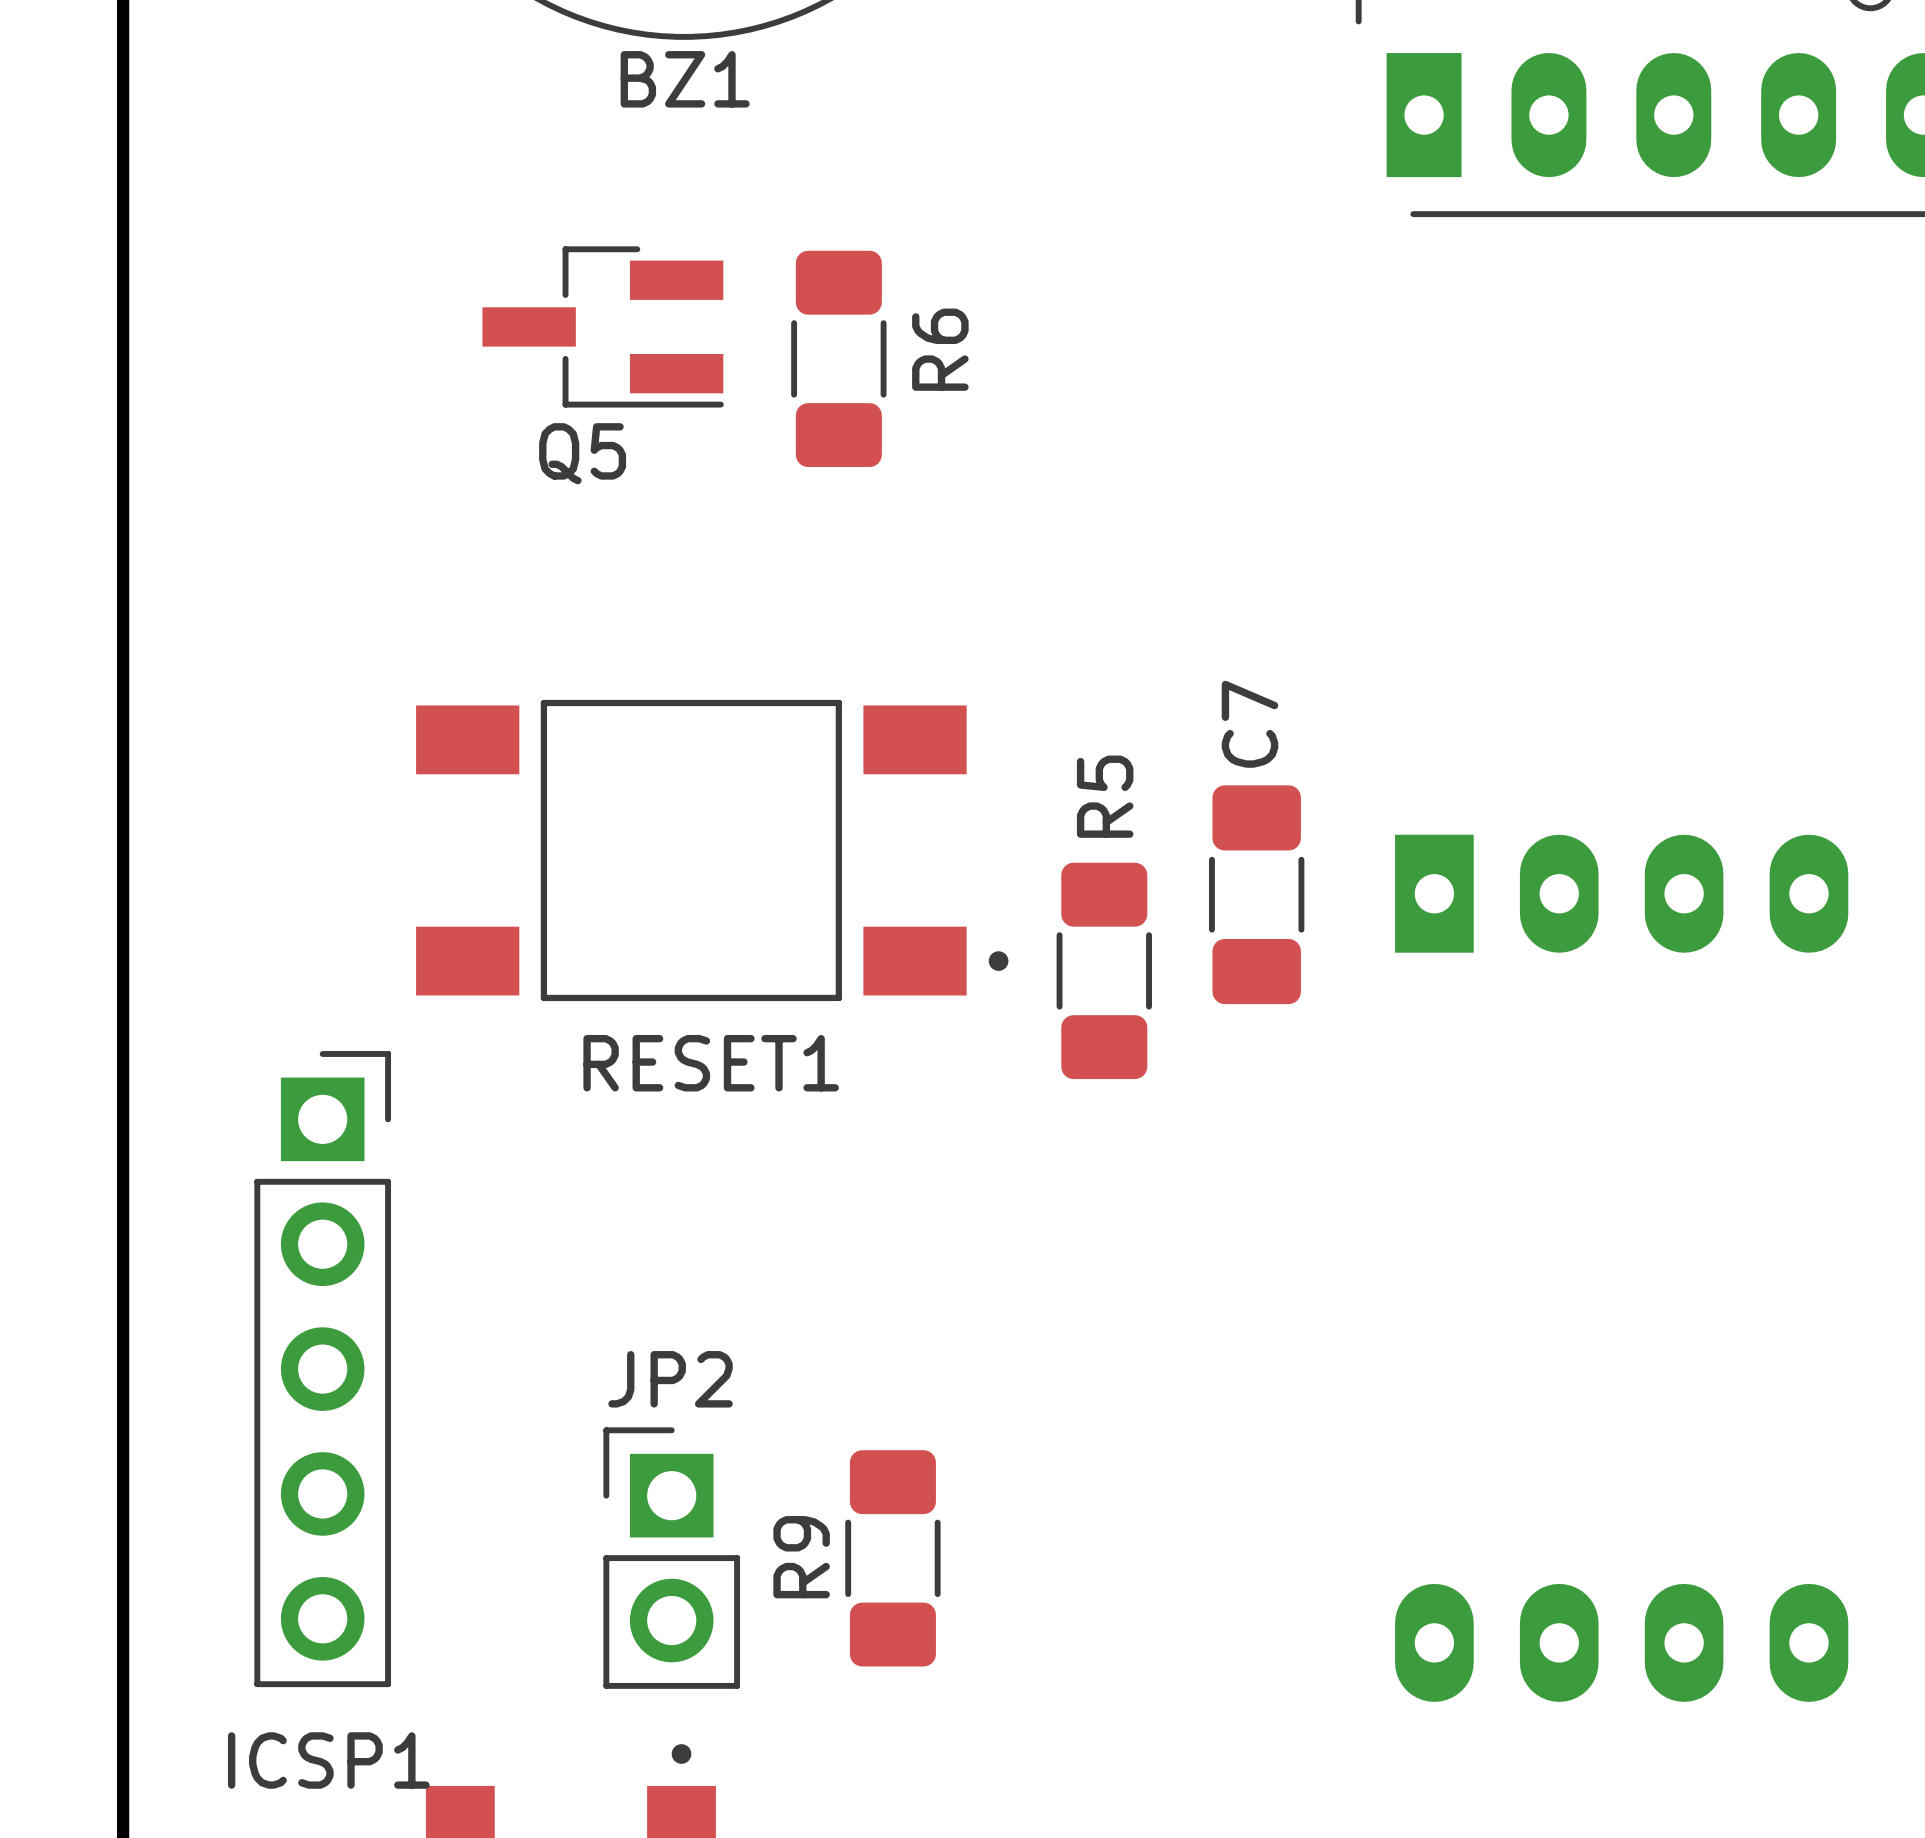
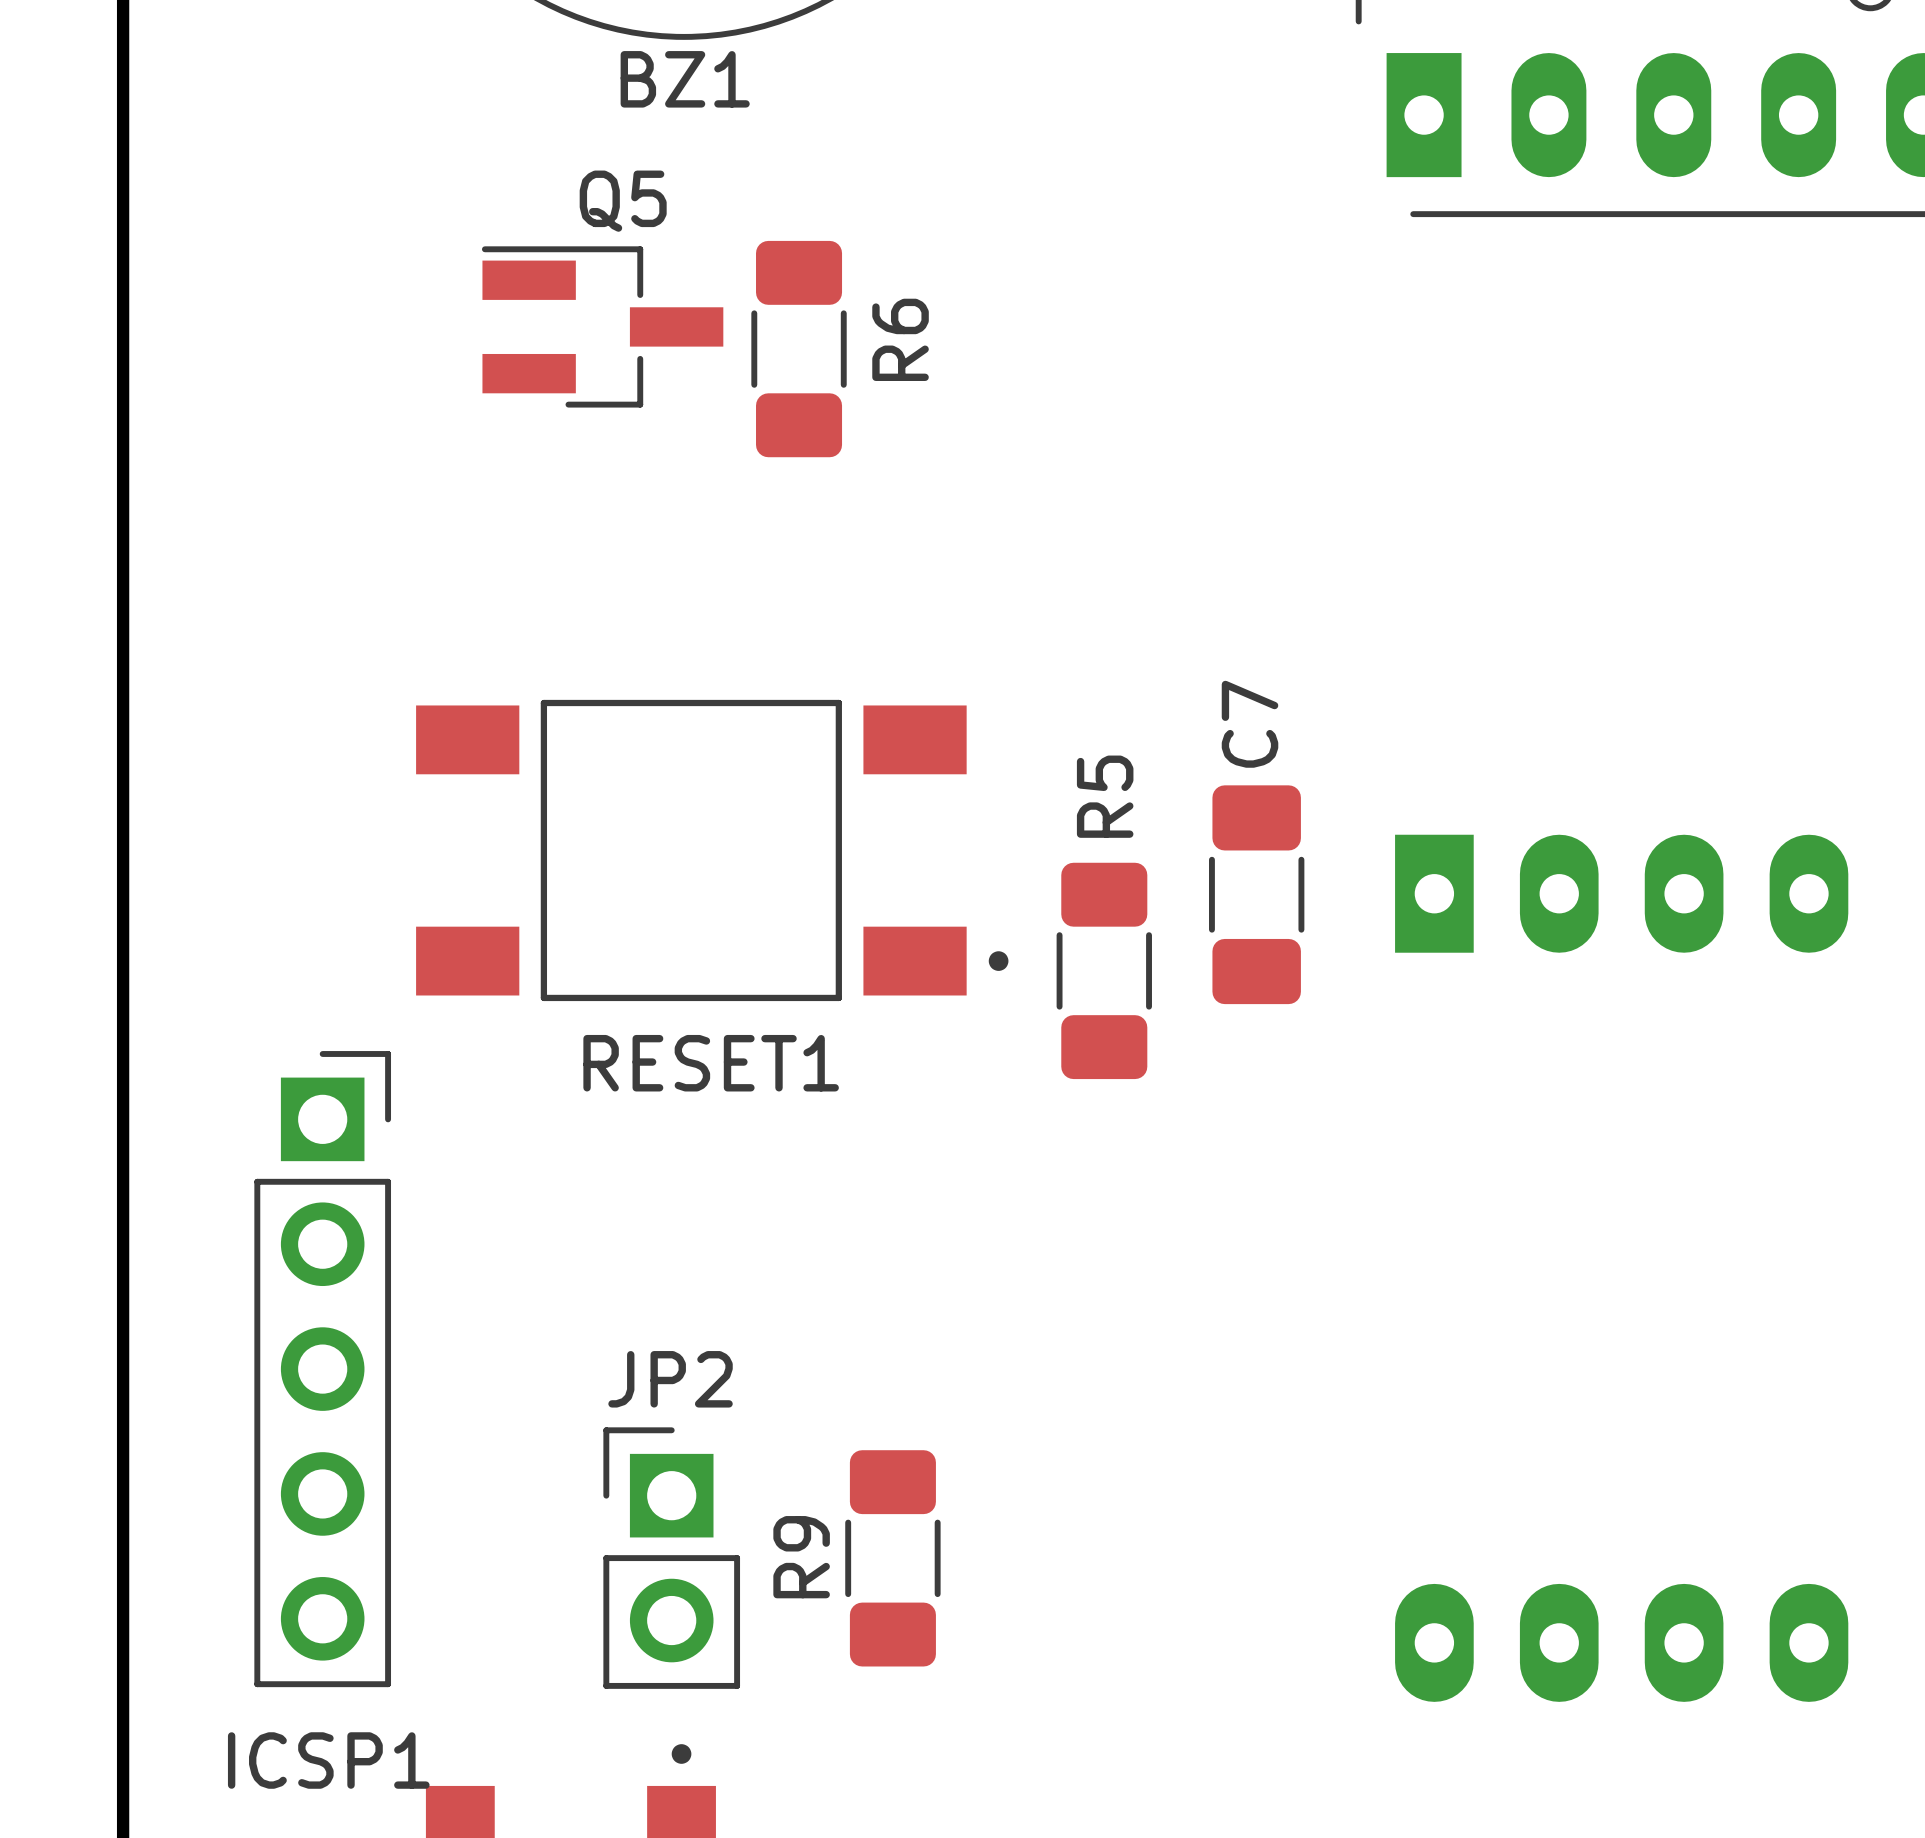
Q5 rotation: 0° (603, 326) -> 180° (602, 326)
R6 position: (838, 358) -> (799, 349)

